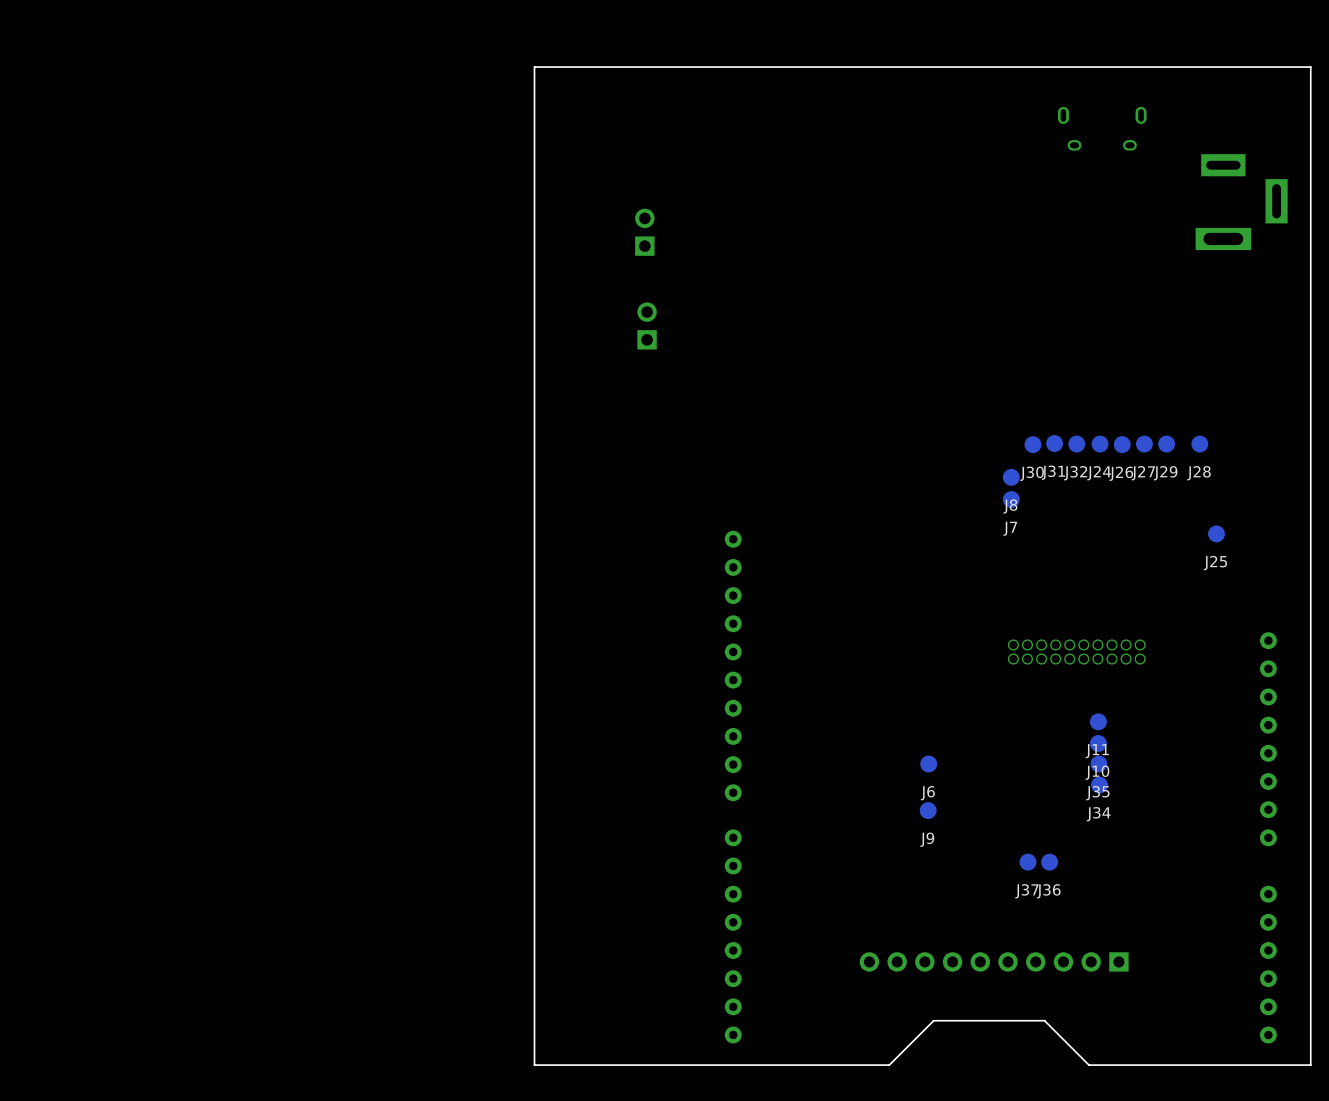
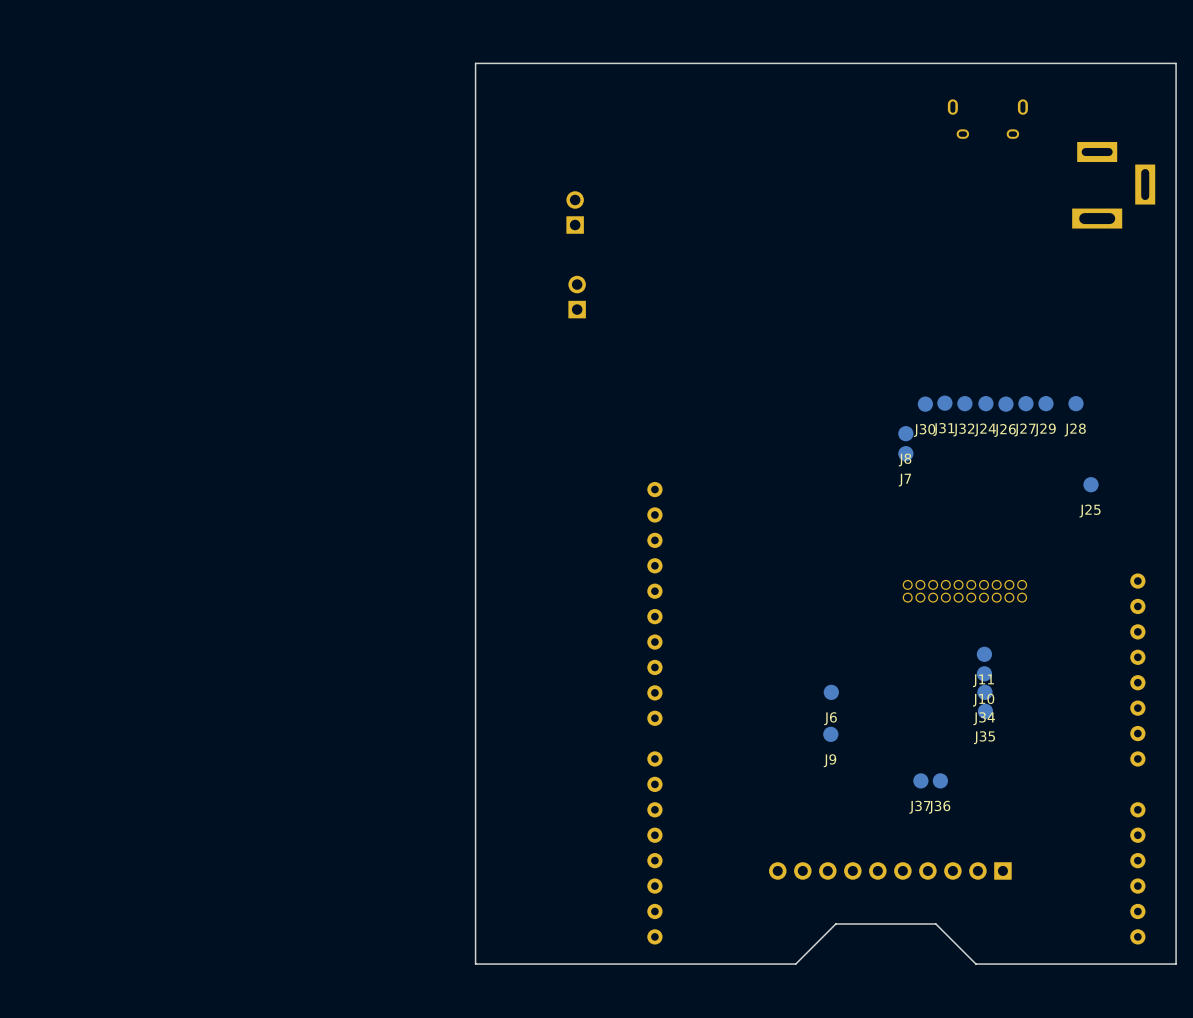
J35 name: J35 (1097, 793) -> J34 (984, 718)
J34 name: J34 (1098, 814) -> J35 (984, 737)

